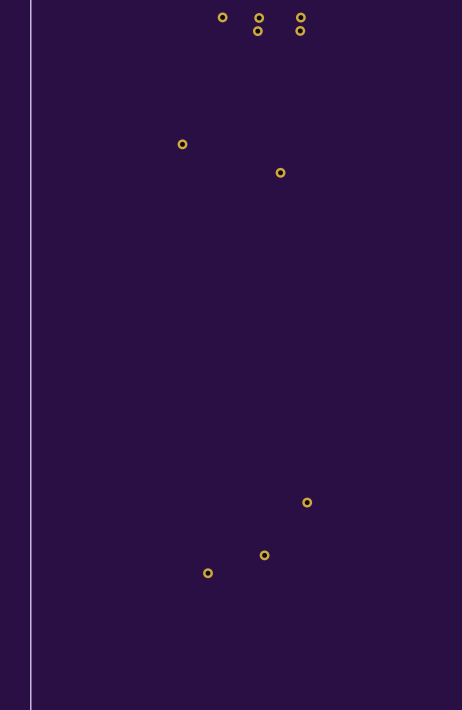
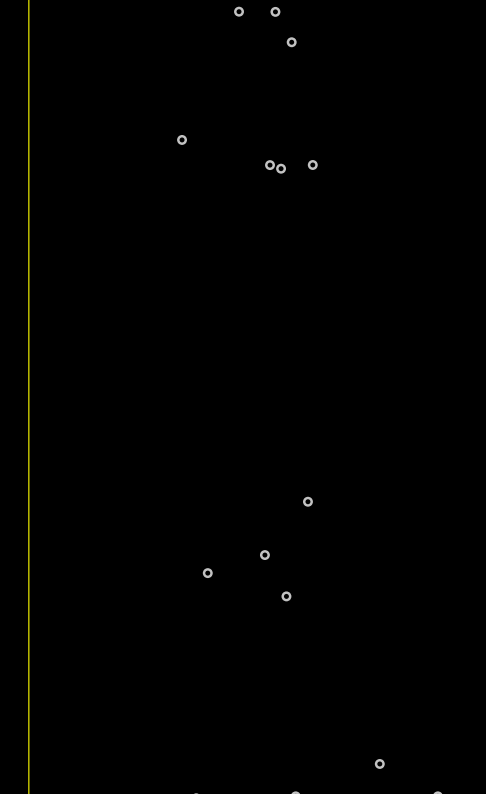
via: (222, 17) -> none
via: none -> (239, 11)
via: (259, 17) -> none
via: none -> (275, 11)
via: (300, 17) -> none
via: (300, 30) -> none
via: (257, 31) -> none
via: none -> (291, 42)
via: none -> (270, 165)
via: none -> (312, 164)
via: none -> (286, 596)

